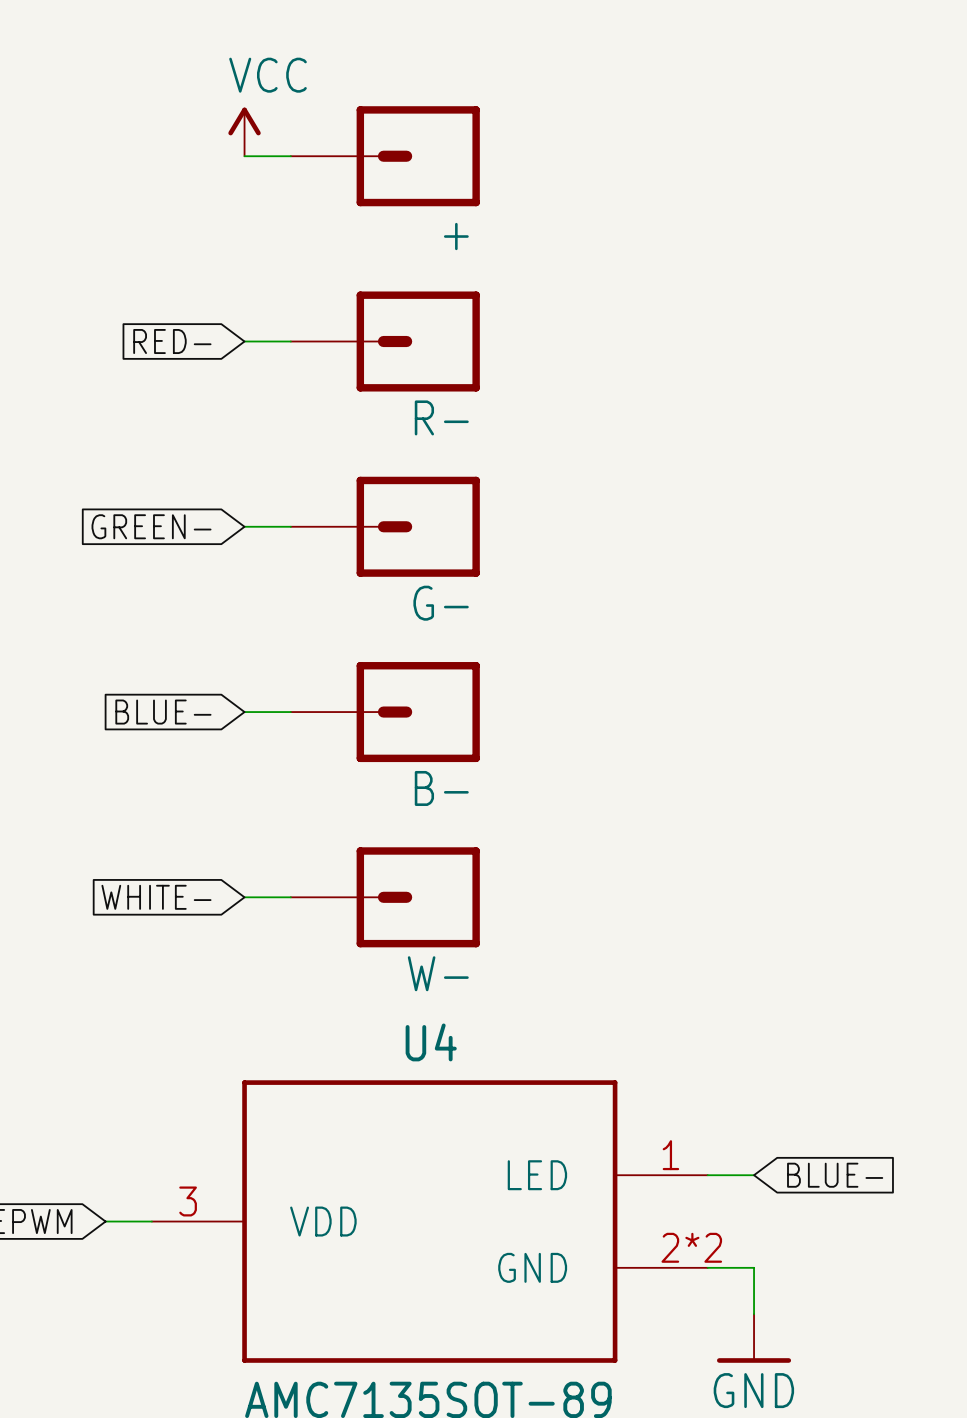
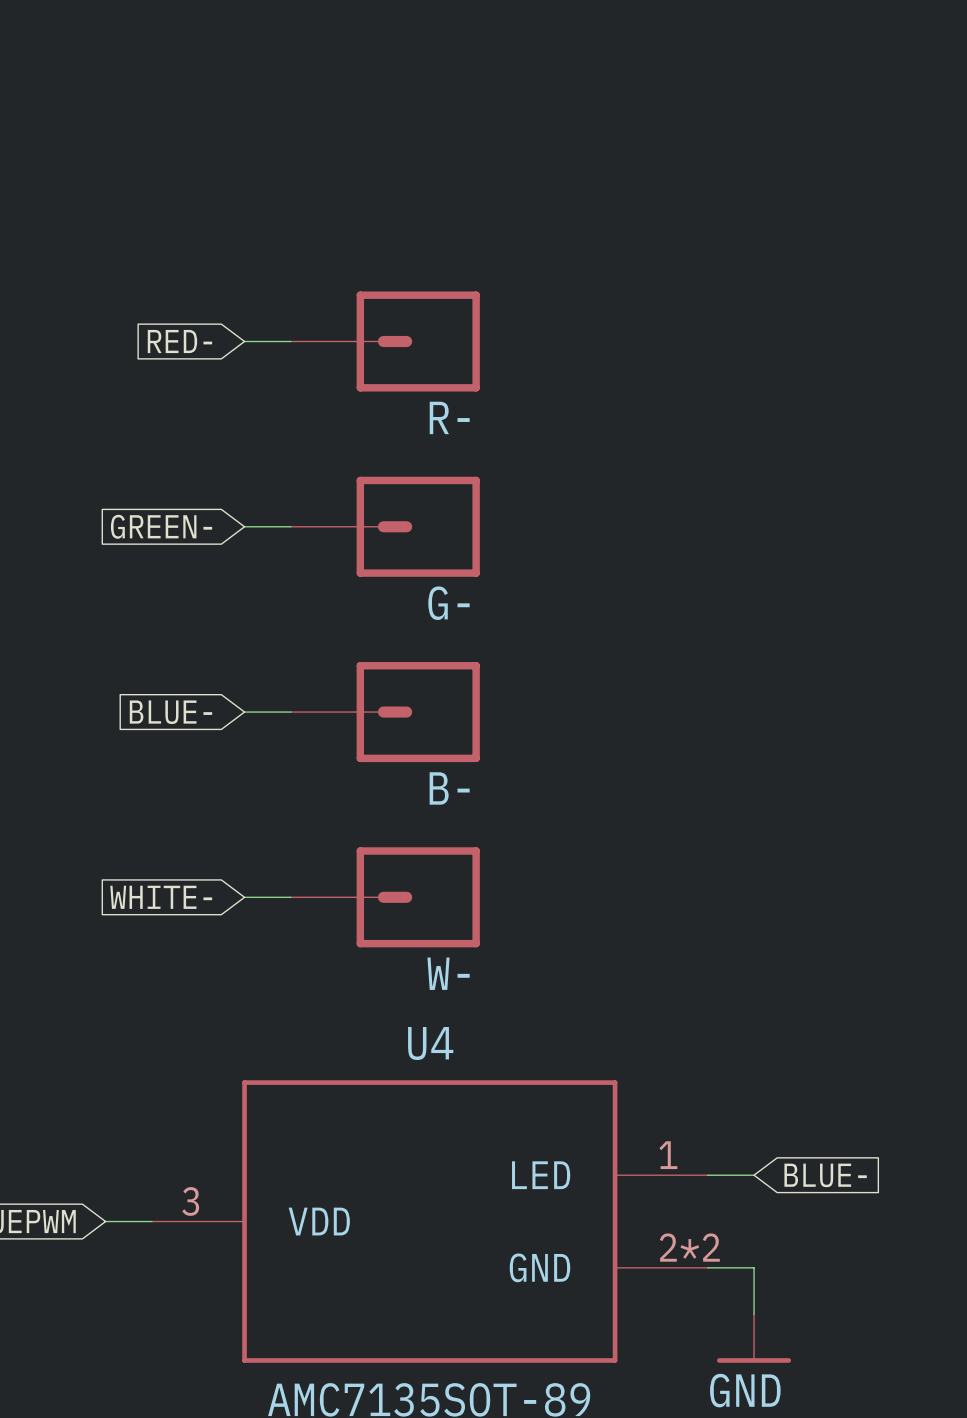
power symbol: VCC (244, 131) -> none
wire: (244, 156) (290, 156) -> none
part: (385, 156) -> none

